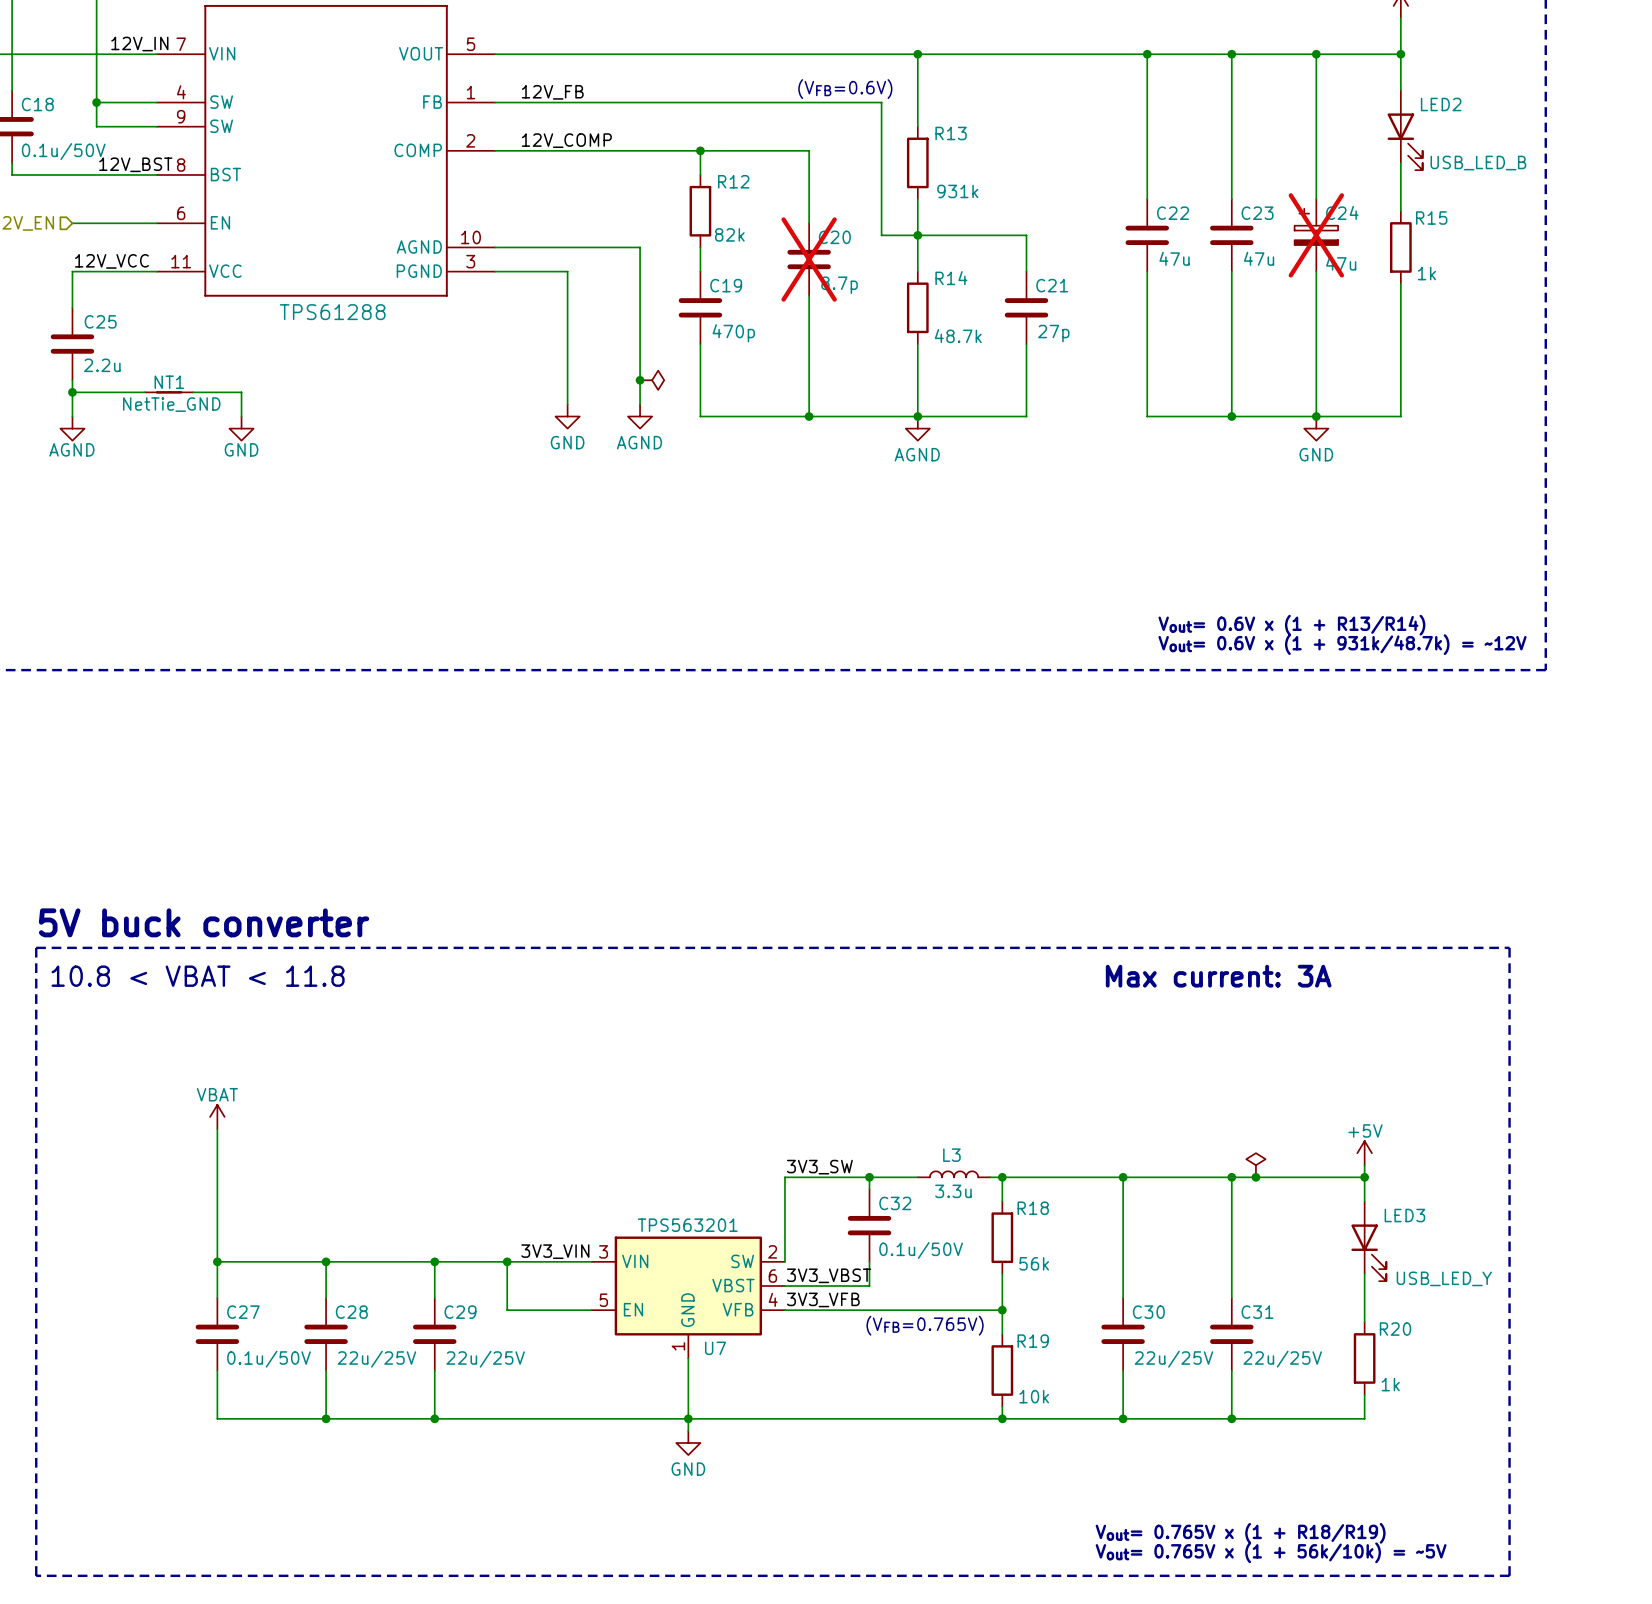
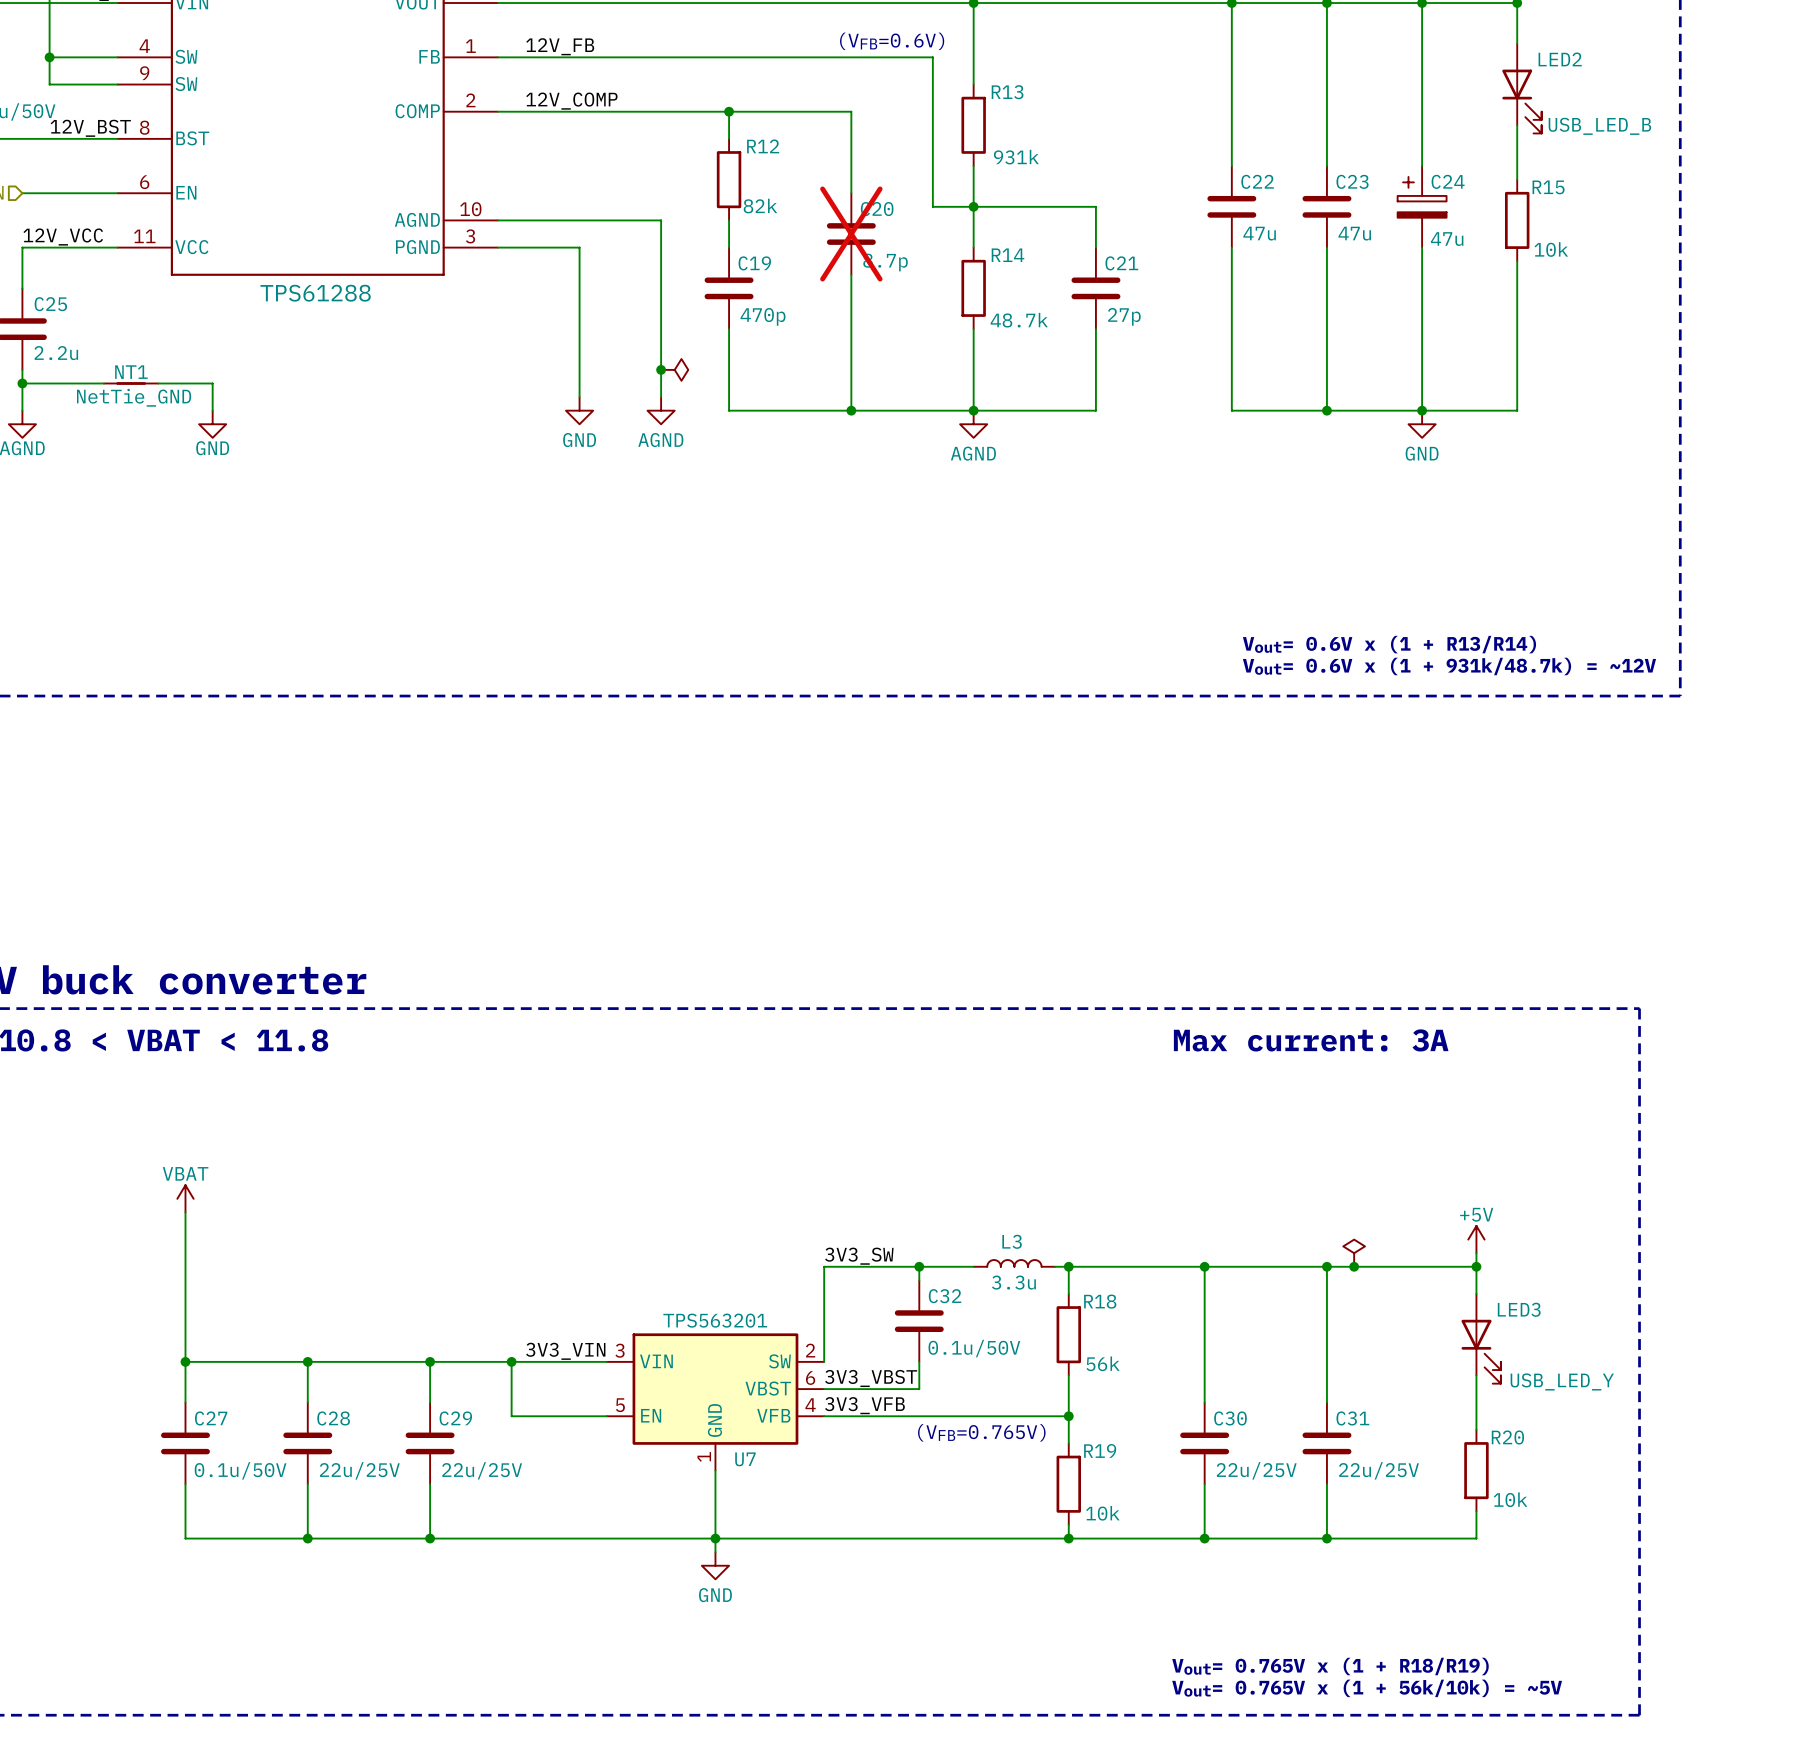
C24 do-not-place cross: (1316, 235) -> none
R15 value: 1k (1426, 273) -> 10k (1551, 249)
R20 value: 1k (1390, 1384) -> 10k (1510, 1499)

